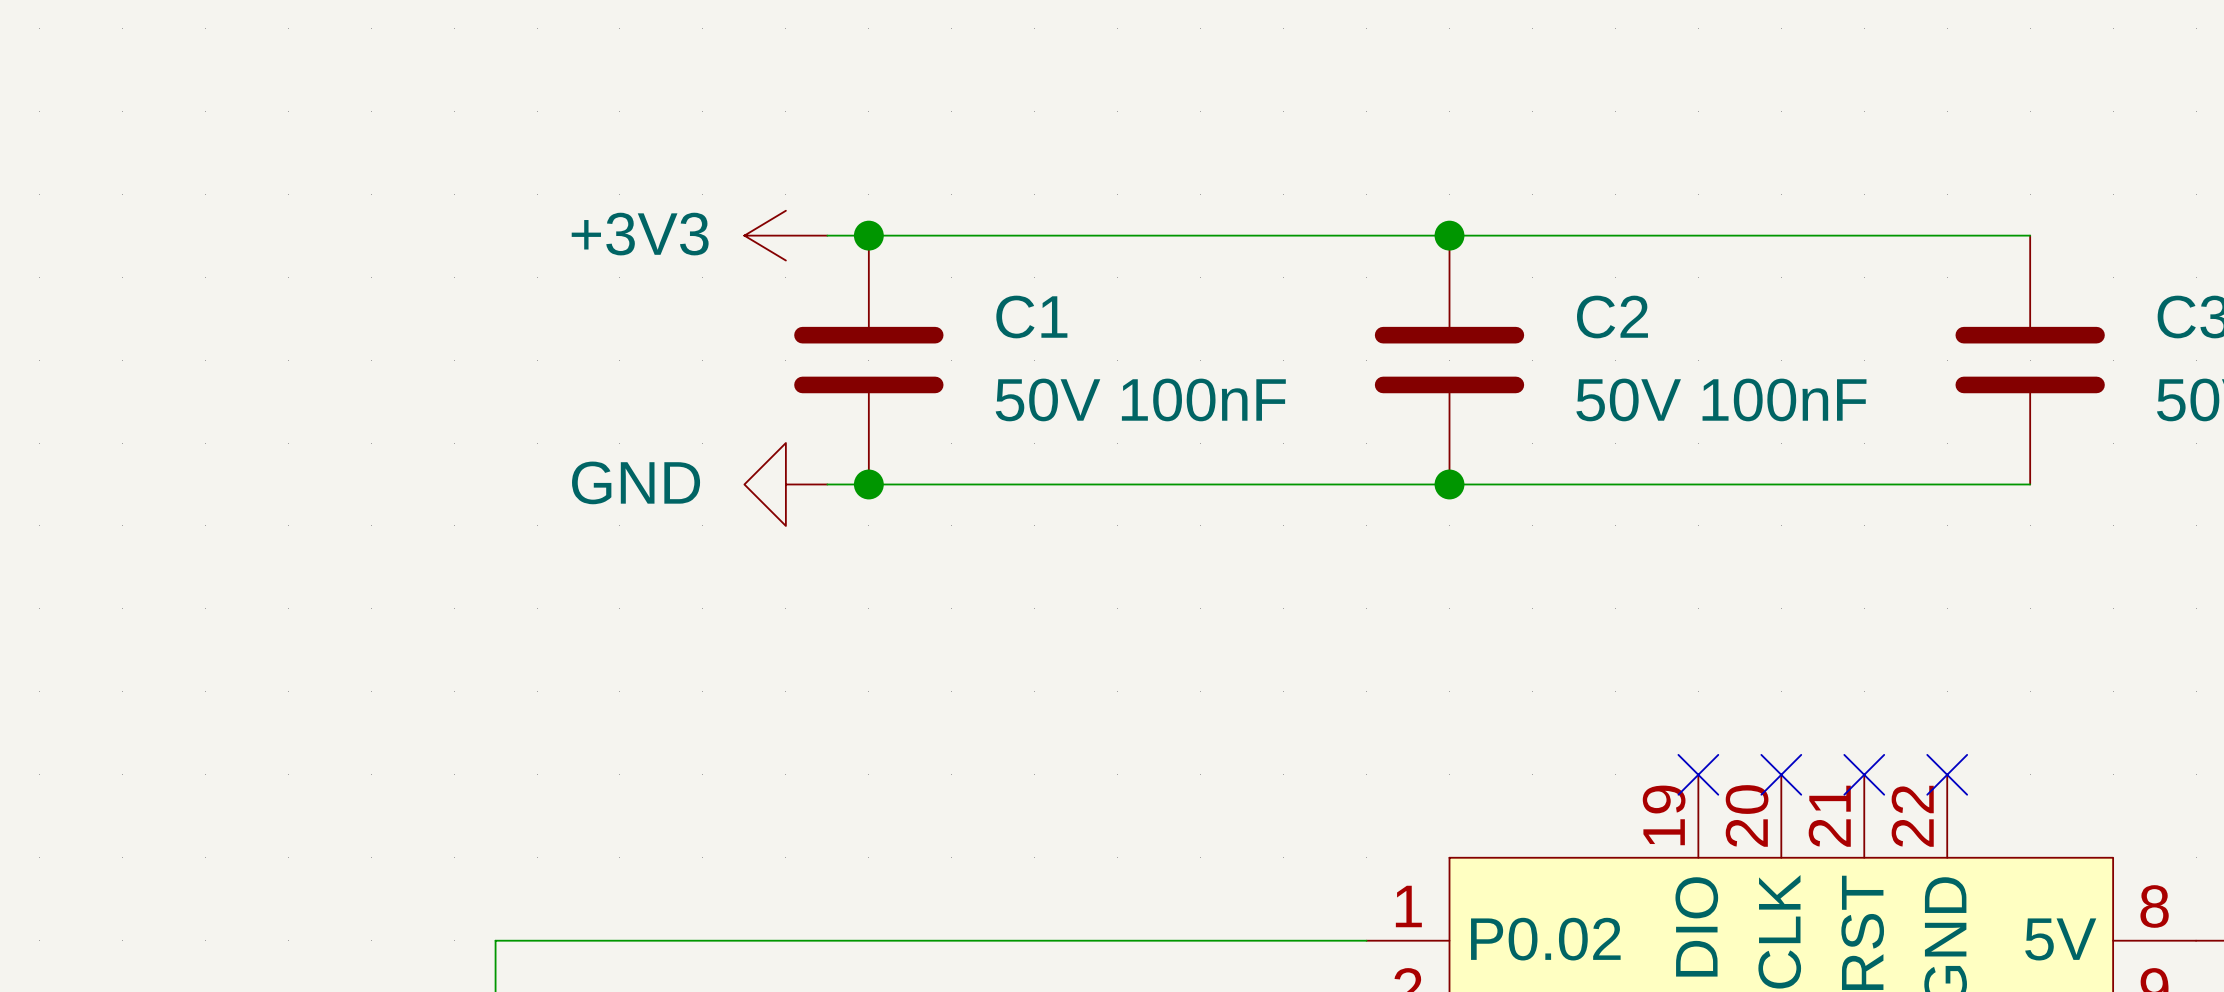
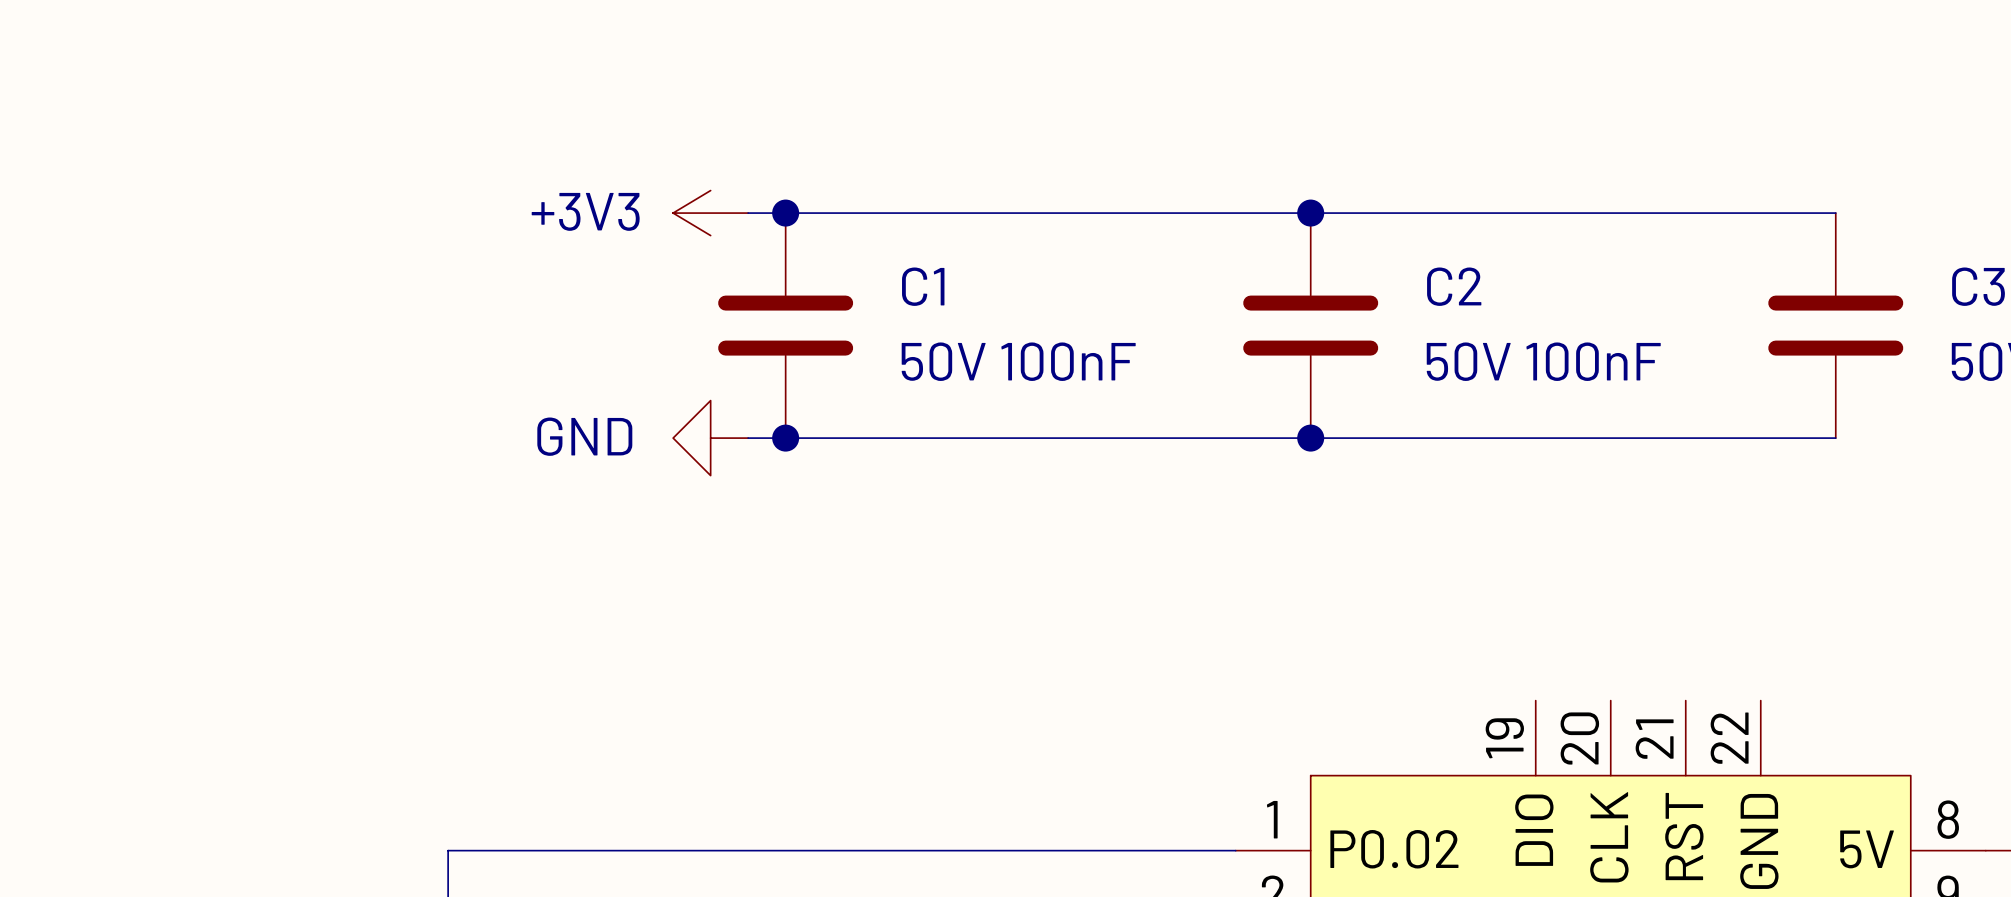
no-connect mark: (1698, 774) -> none
no-connect mark: (1781, 774) -> none
no-connect mark: (1864, 774) -> none
no-connect mark: (1947, 774) -> none

